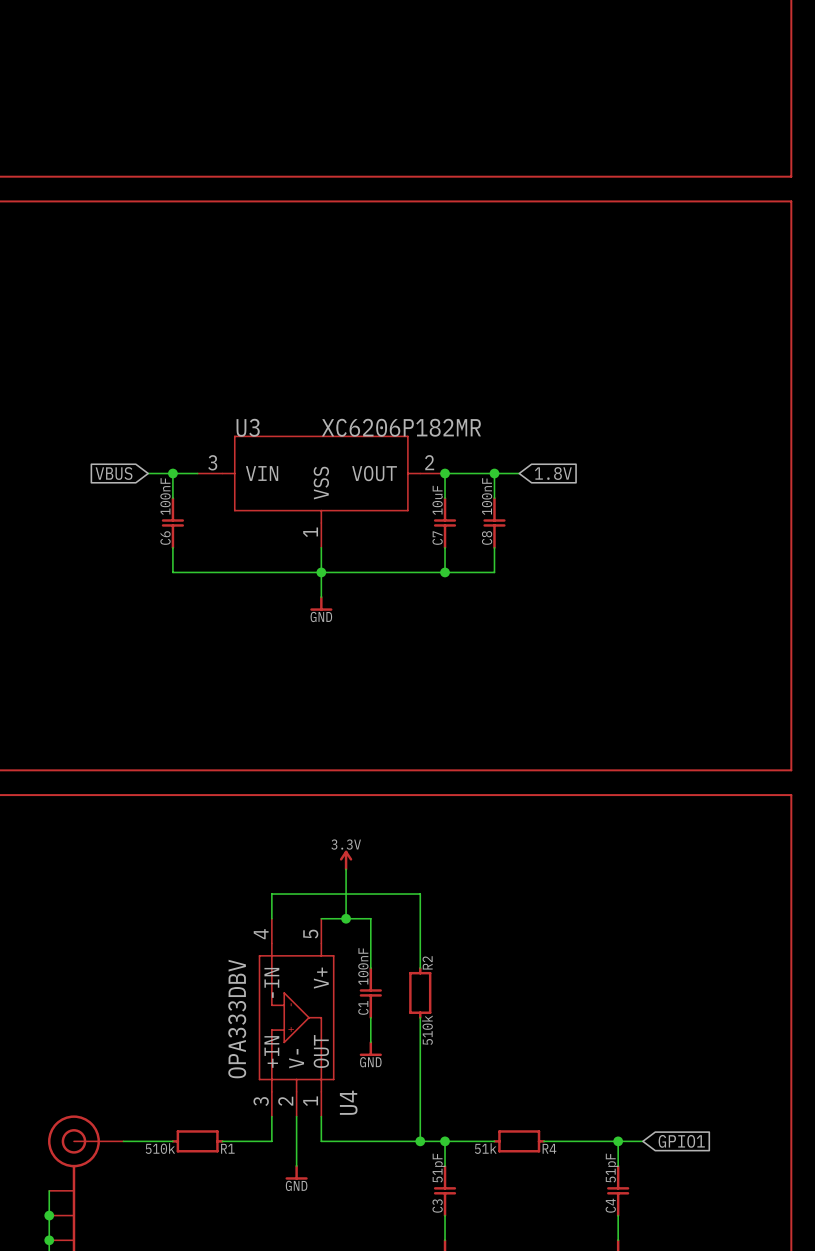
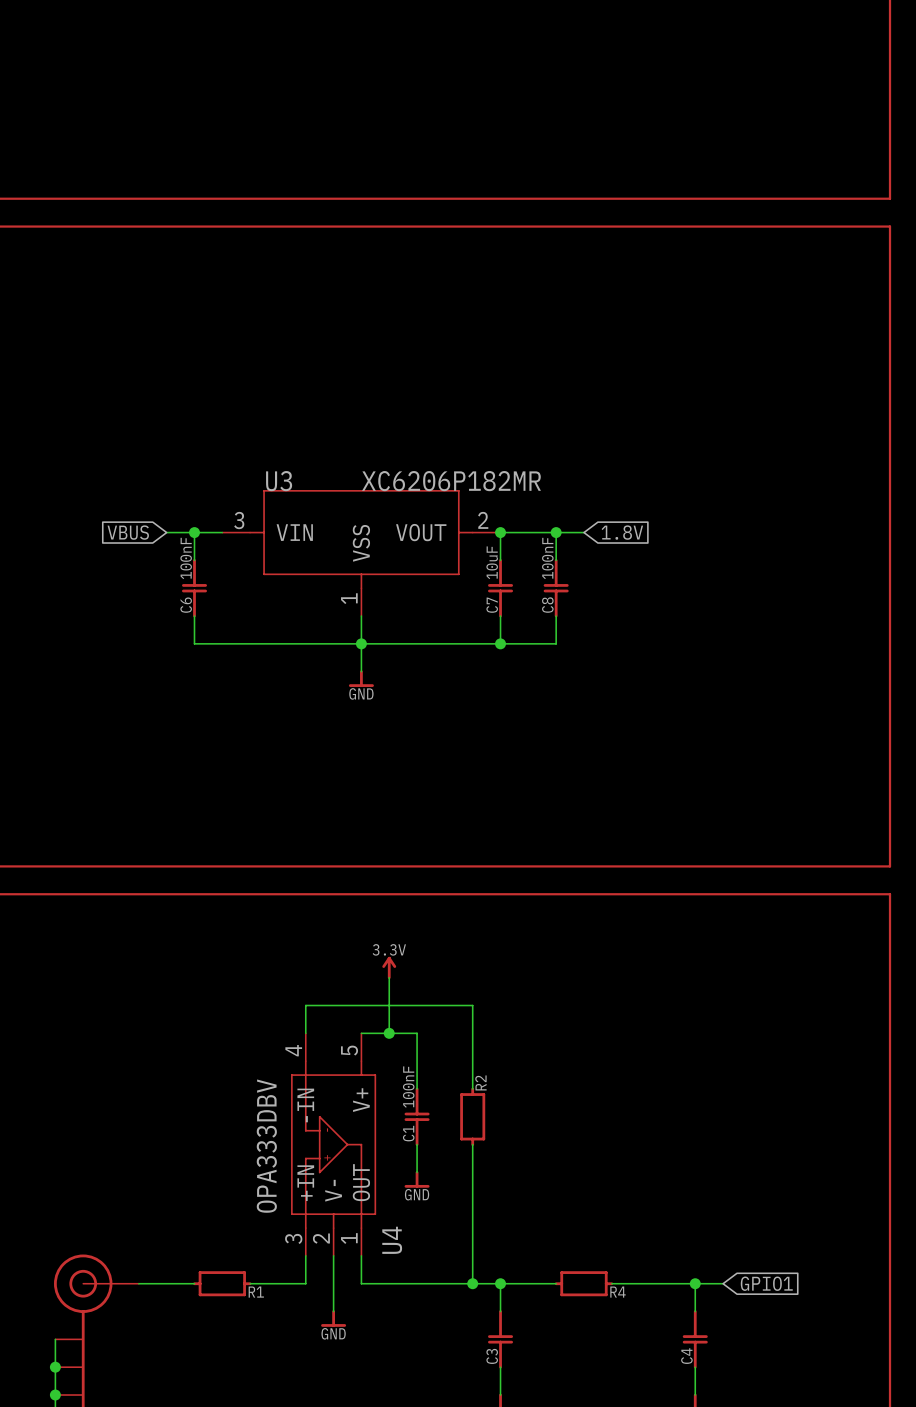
R2 value: 510k (427, 1030) -> none
R1 value: 510k (160, 1148) -> none
R4 value: 51k (485, 1148) -> none
C3 value: 51pF (439, 1168) -> none
C4 value: 51pF (612, 1168) -> none

